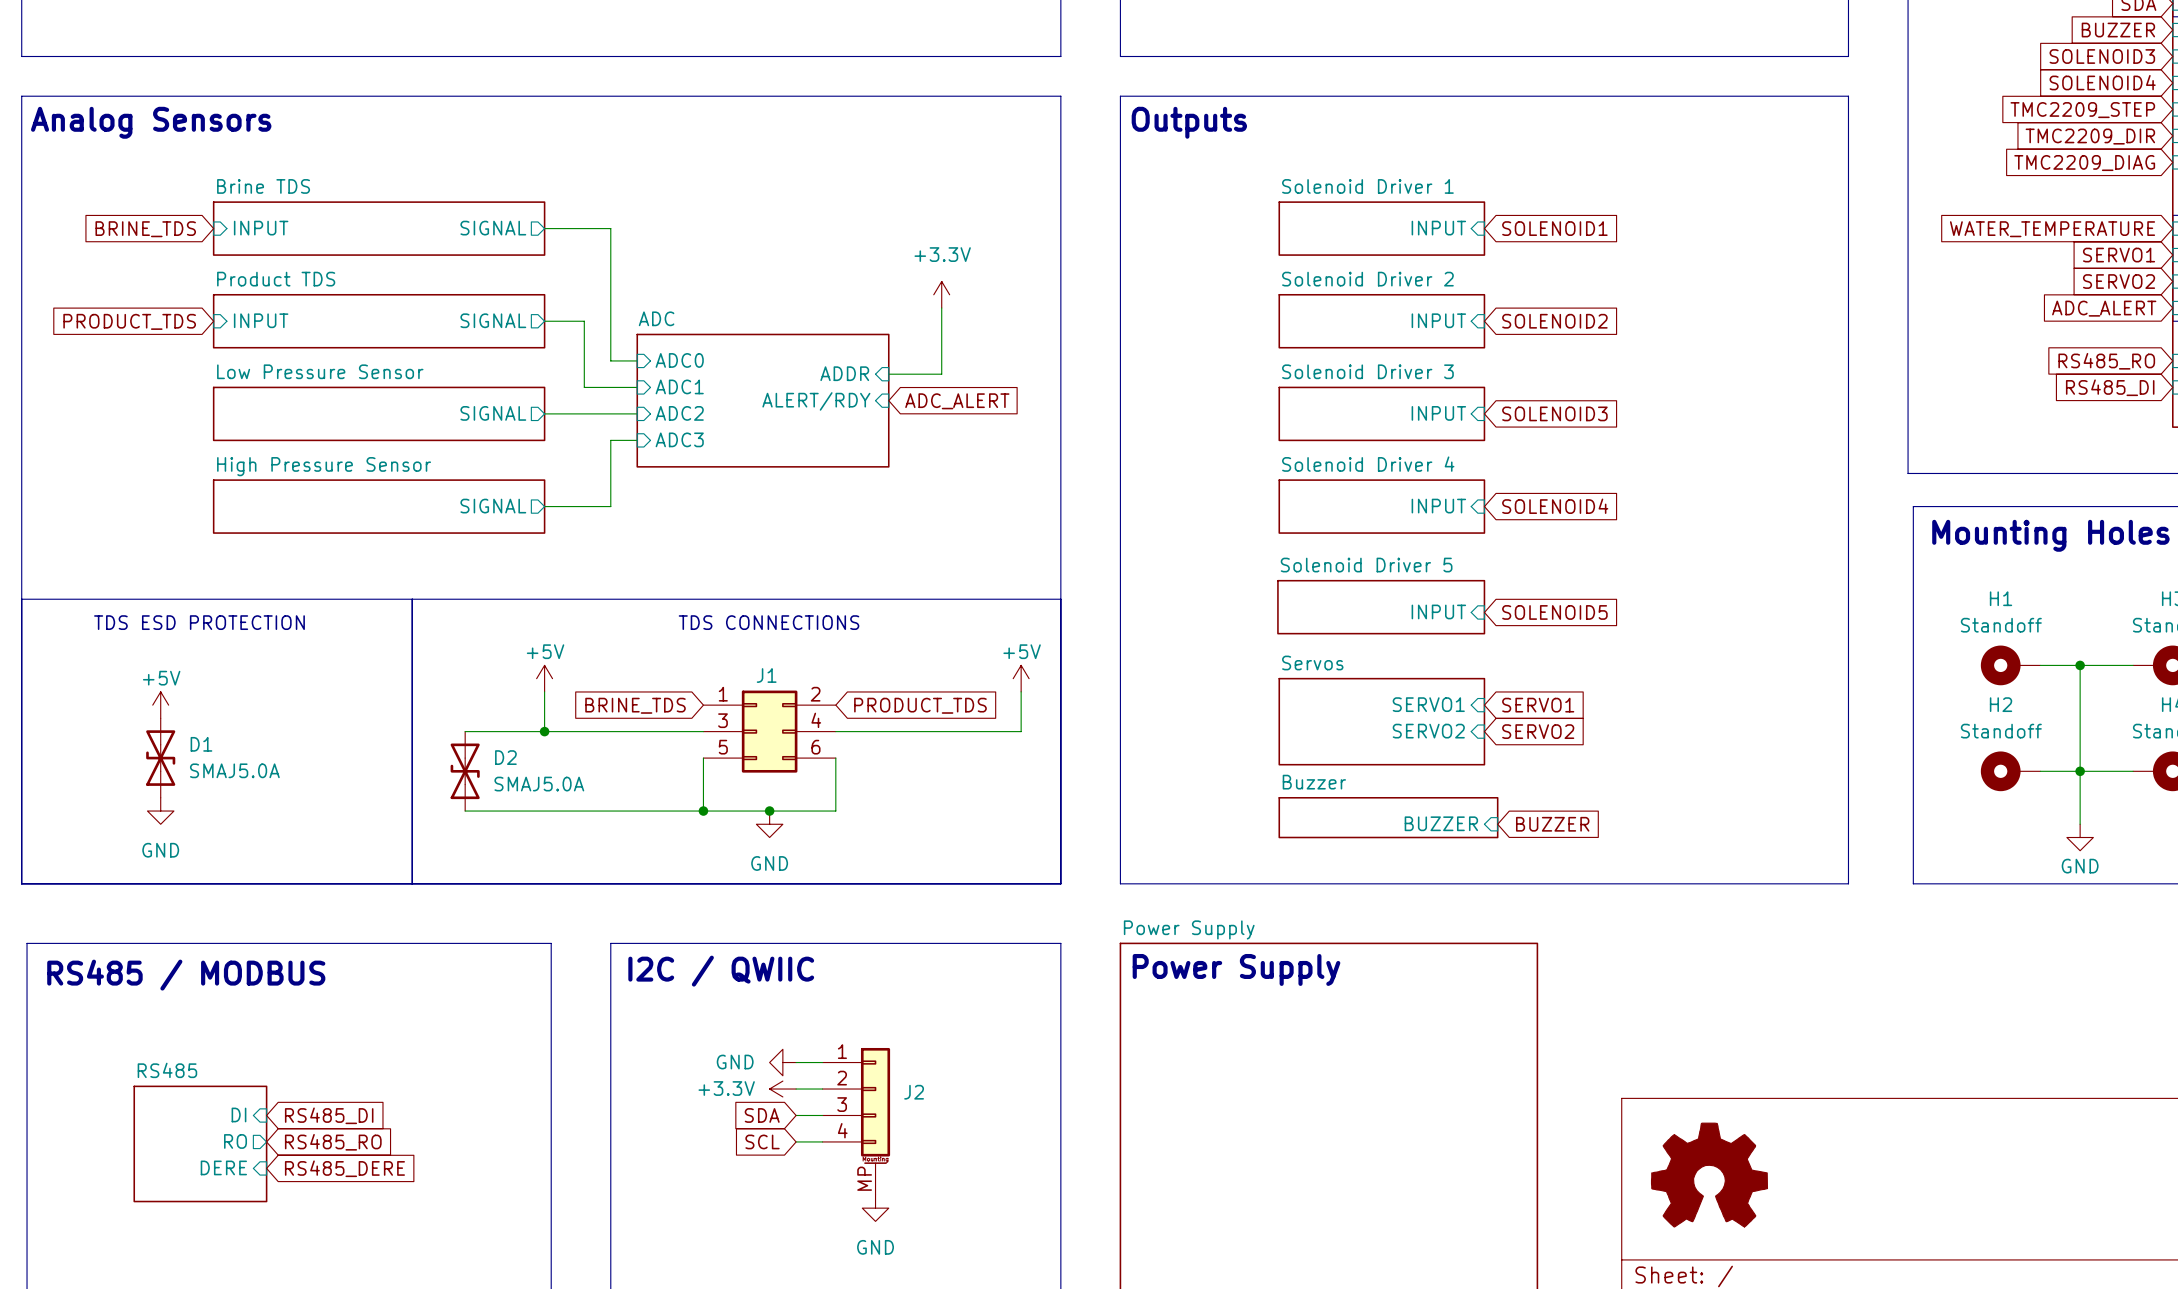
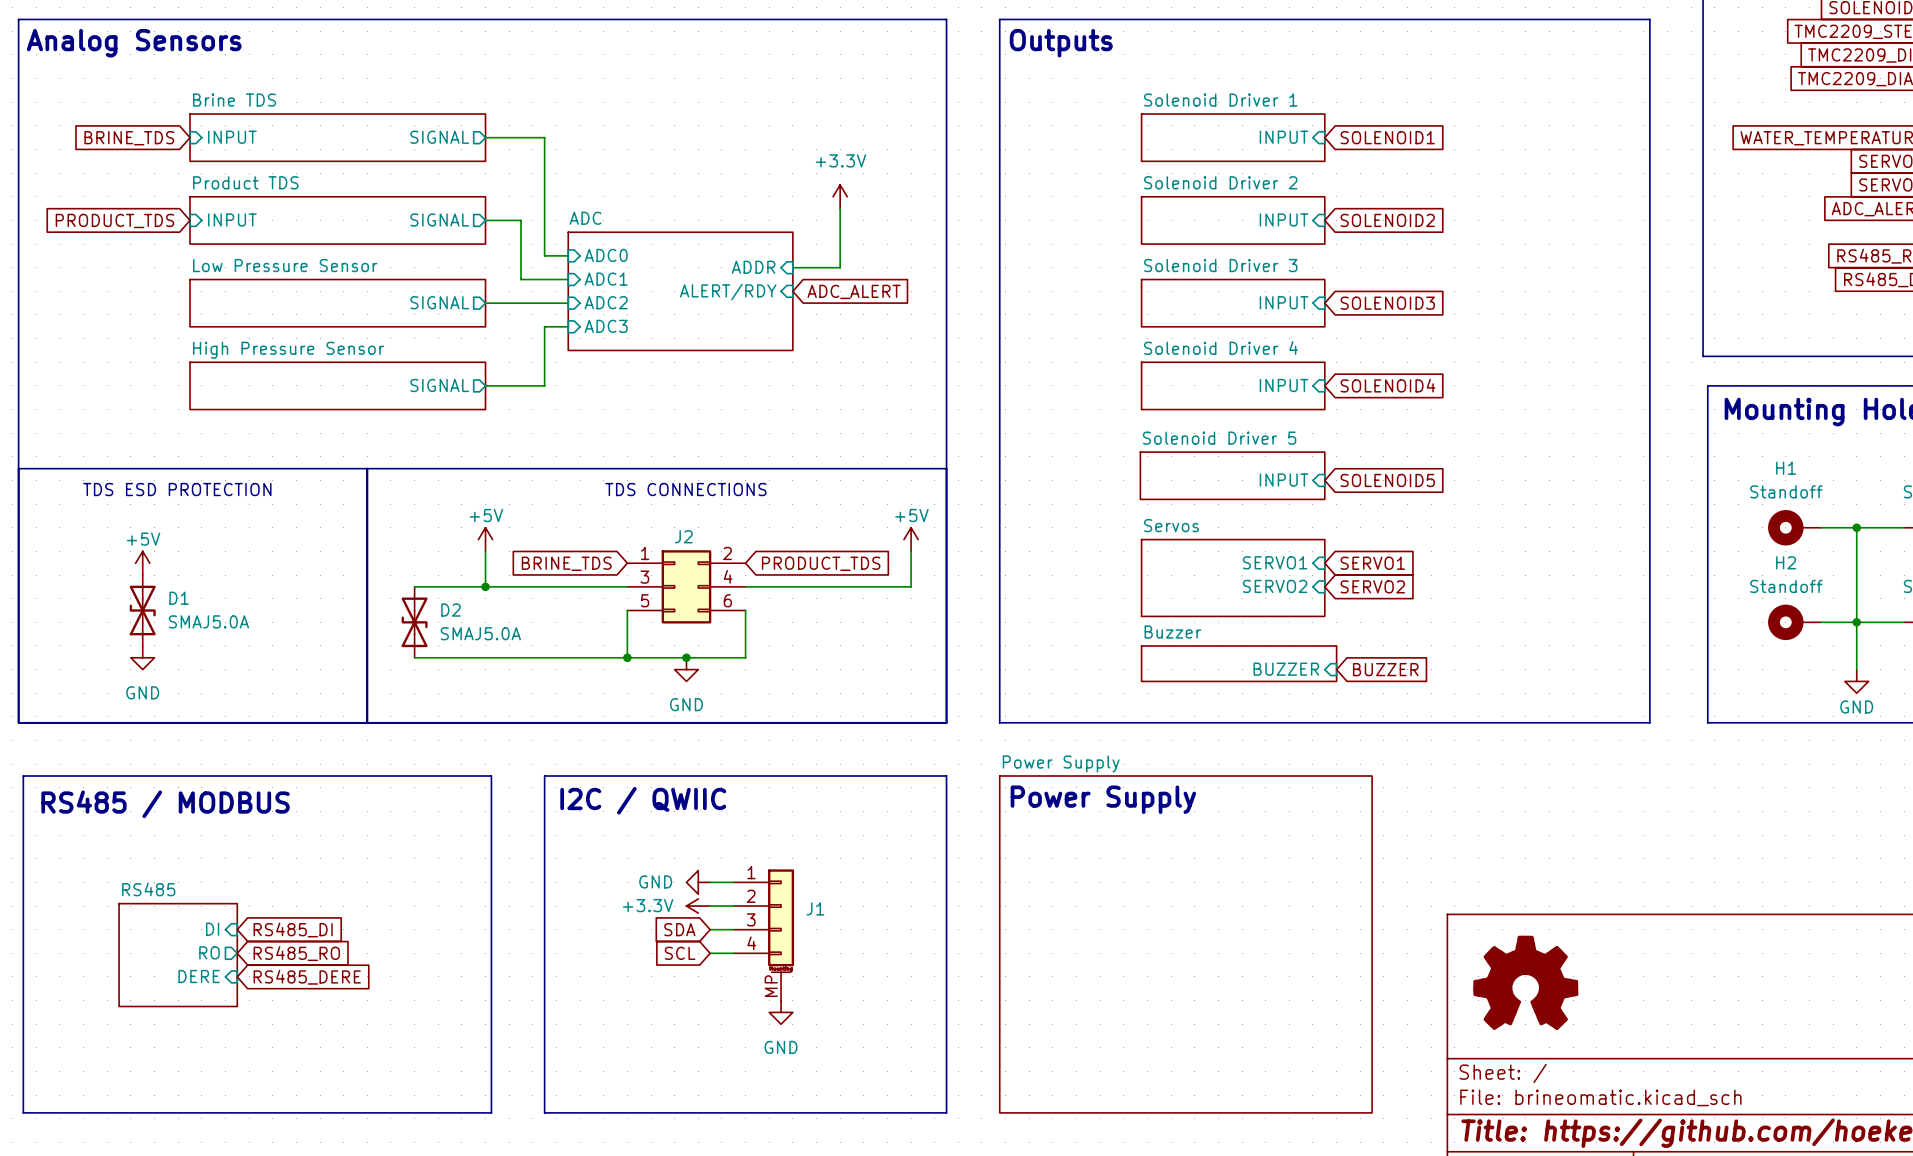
J1 name: J1 (766, 675) -> J2 (683, 536)
J2 name: J2 (914, 1092) -> J1 (815, 908)

